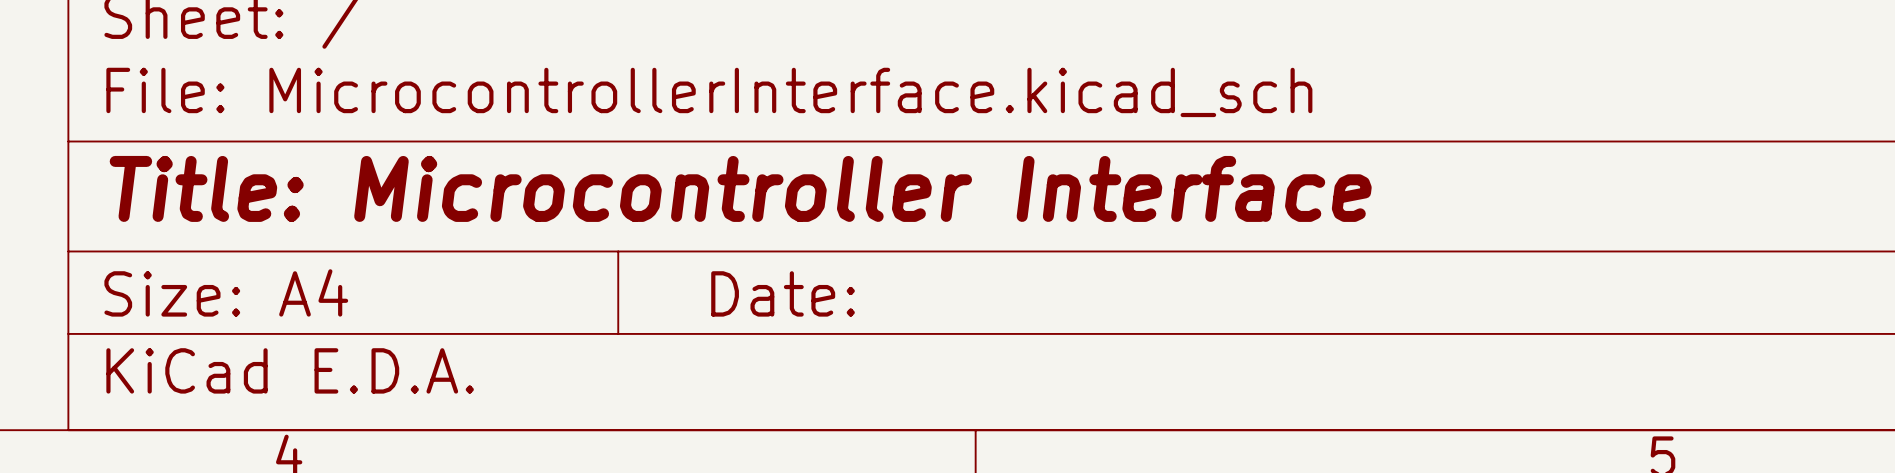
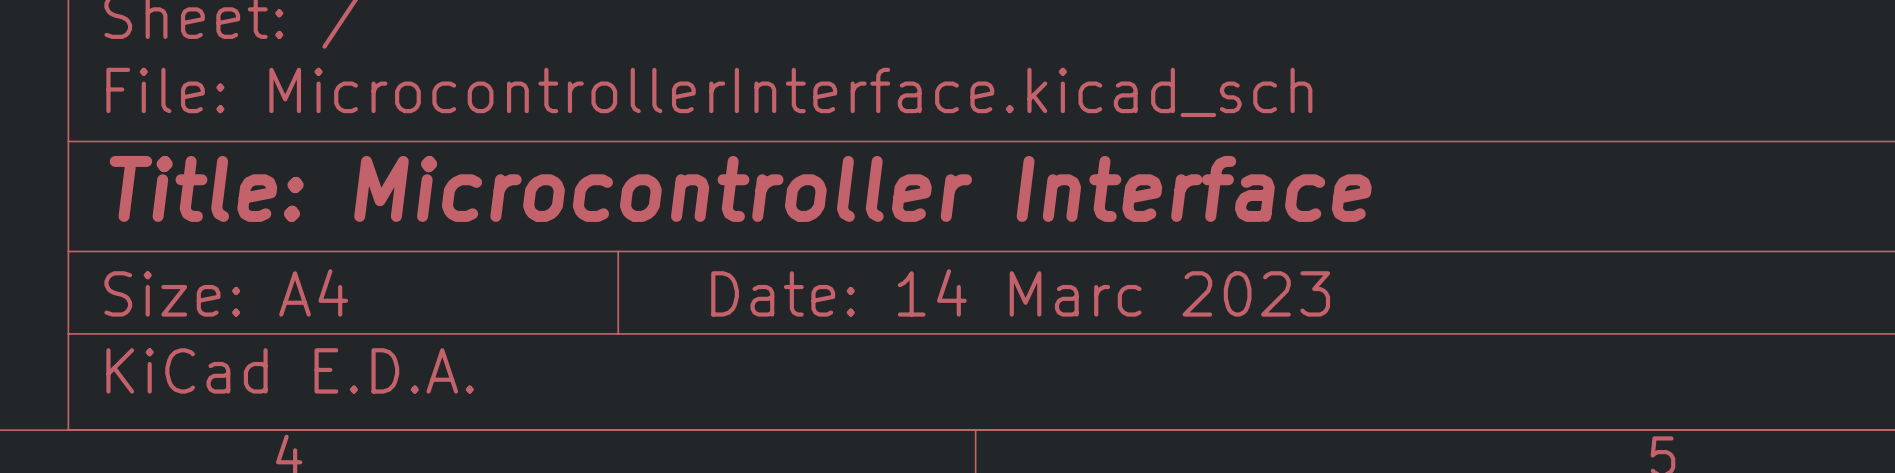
title block: Date: (783, 293) -> Date: 14 Marc 2023 (1020, 292)

